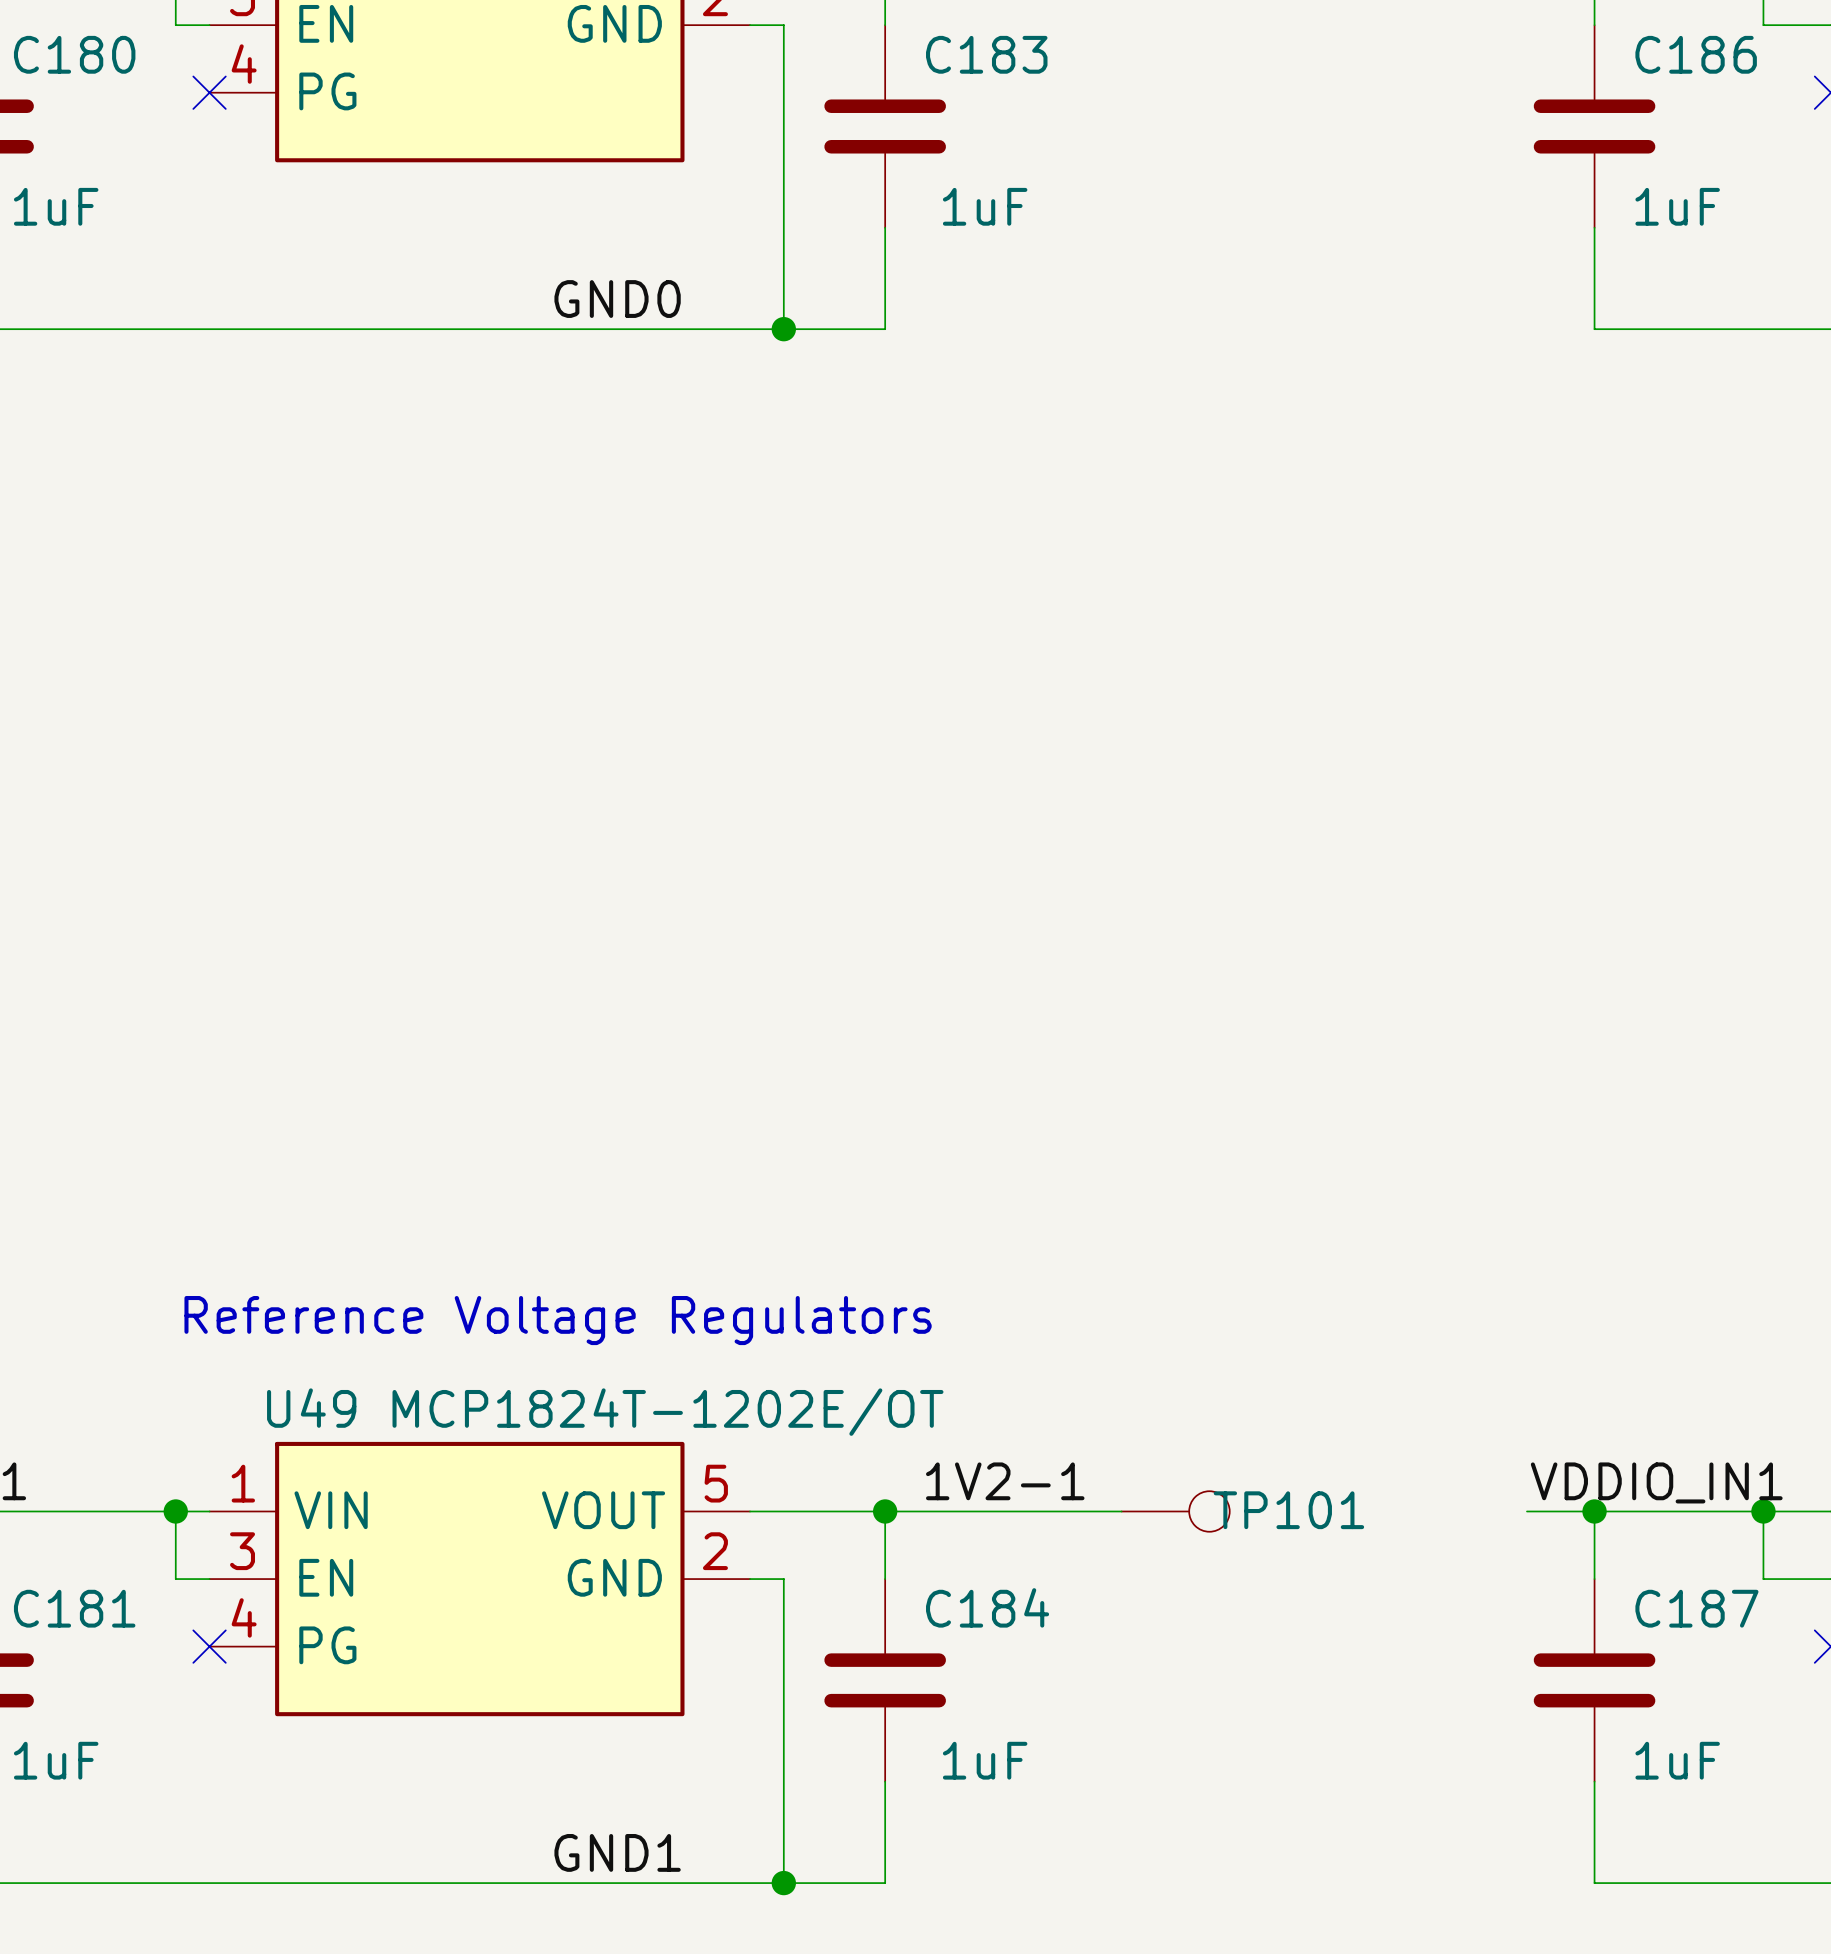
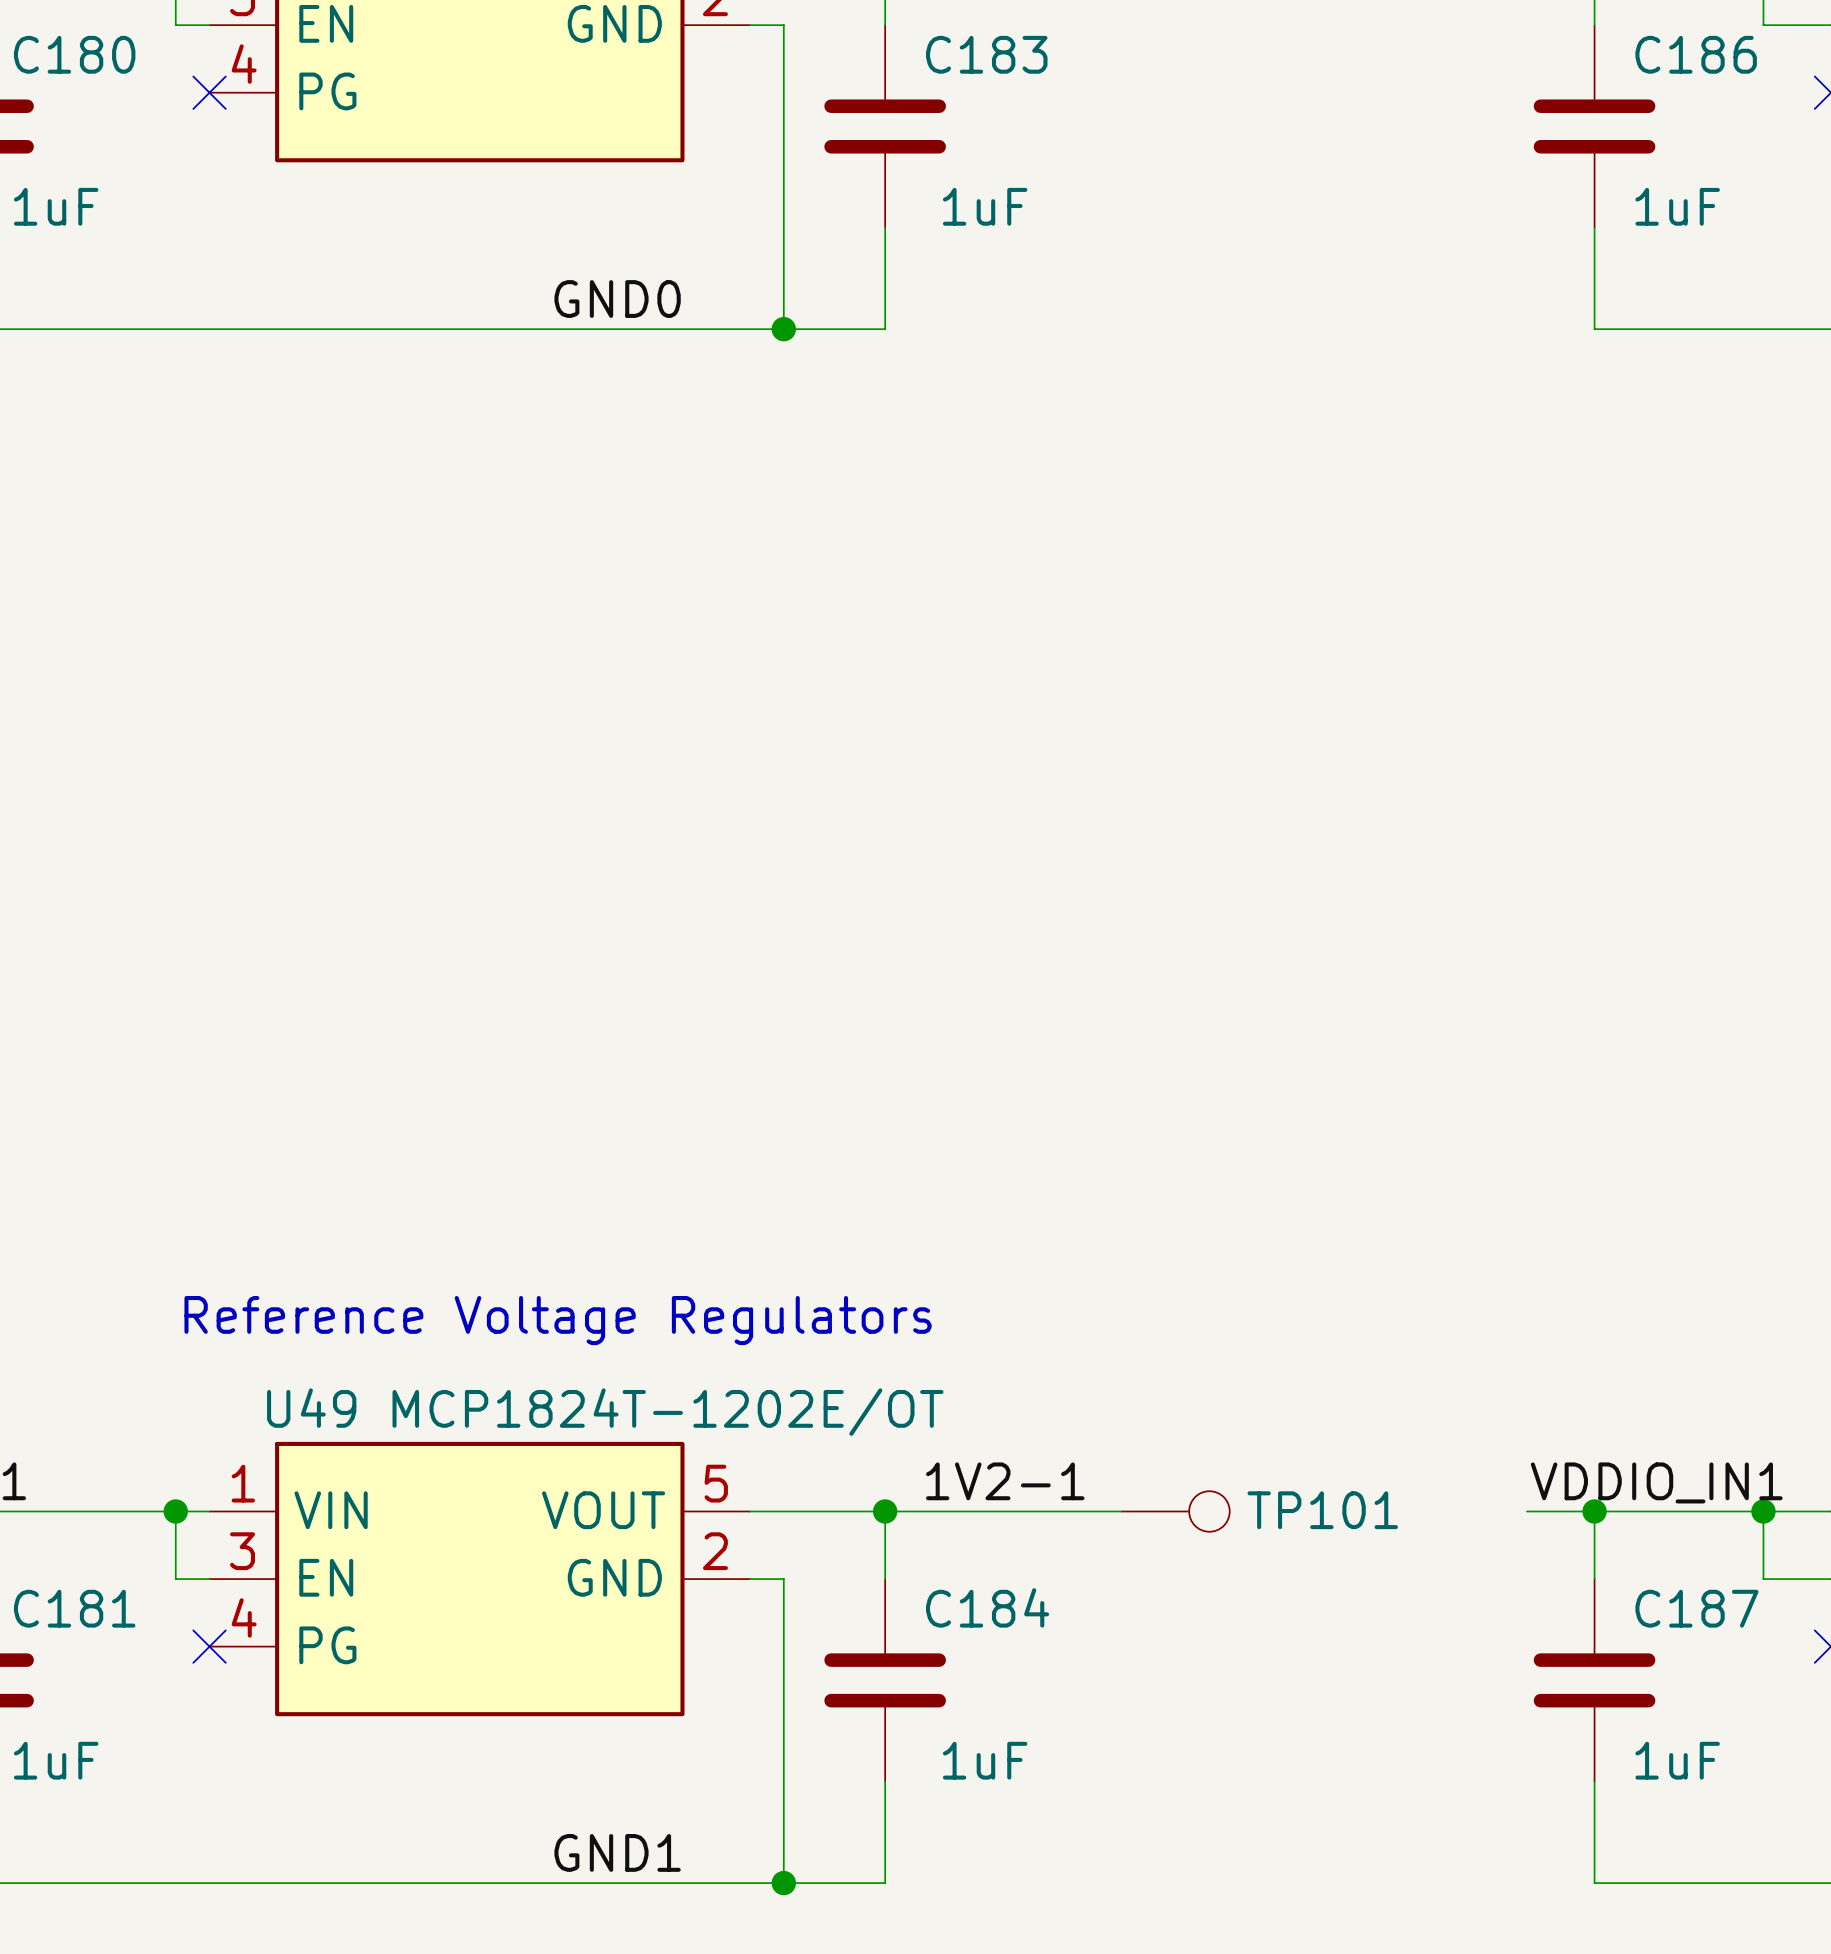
TP101 name position: TP101 (1288, 1510) -> TP101 (1322, 1510)

